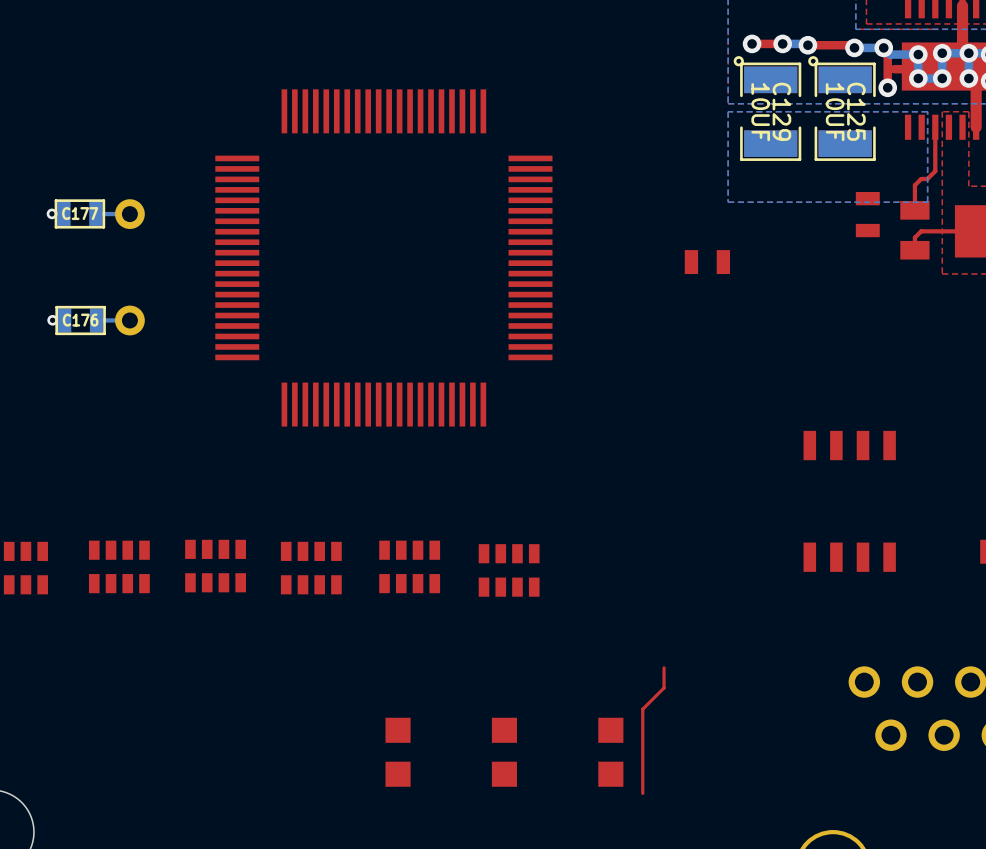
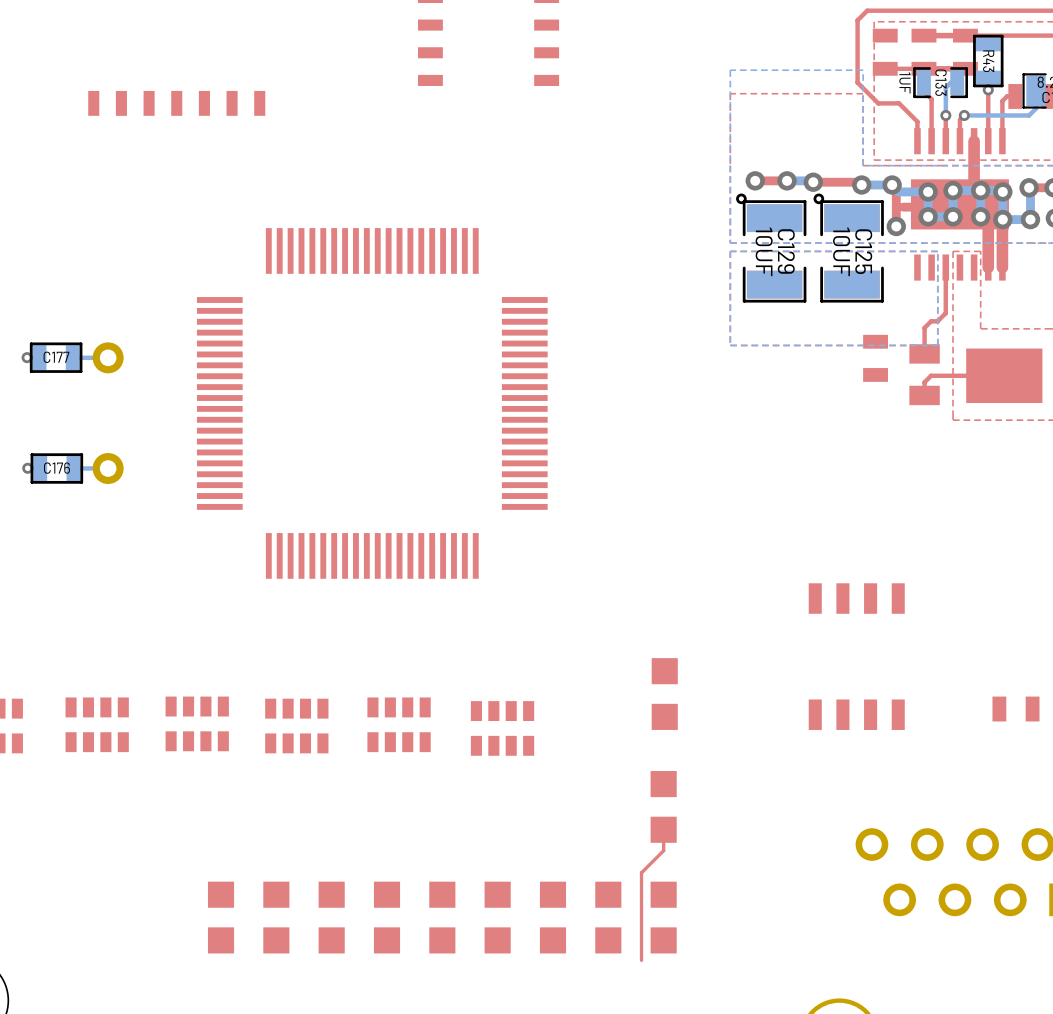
part: (707, 262) -> none
part: none -> (664, 694)
part: none -> (663, 806)
part: none -> (221, 917)
part: none -> (276, 917)
part: none -> (331, 917)
part: none -> (442, 917)
part: none -> (552, 917)
part: none -> (663, 917)

